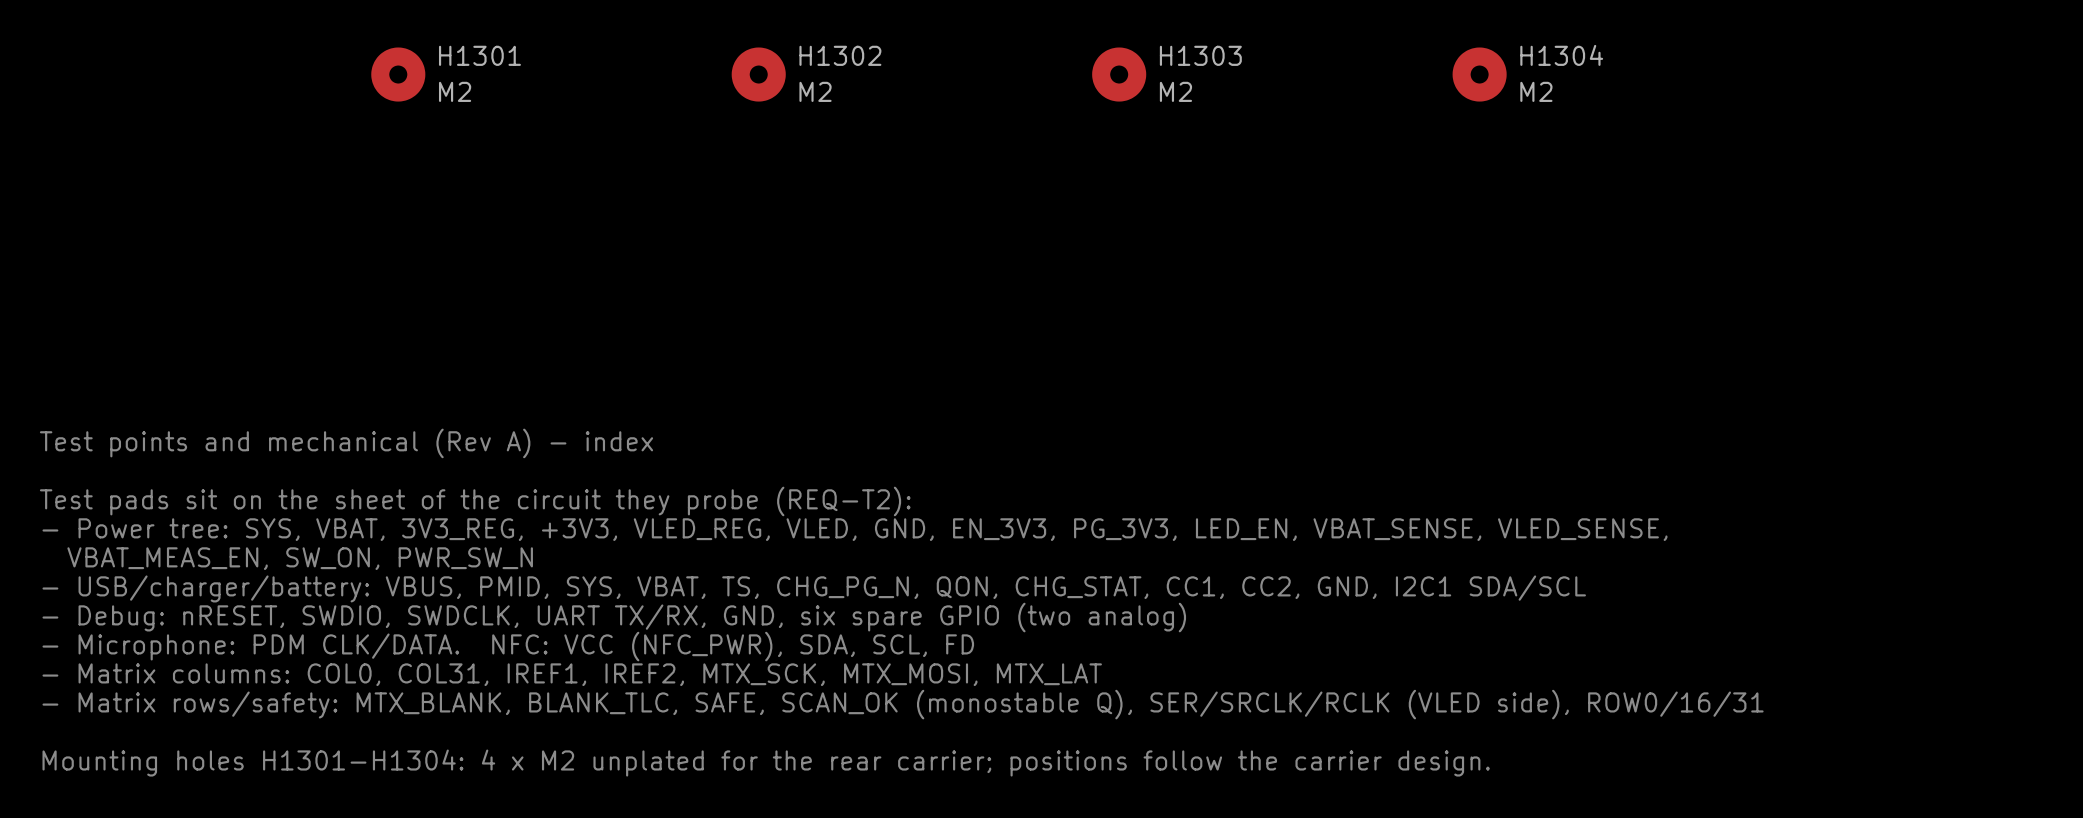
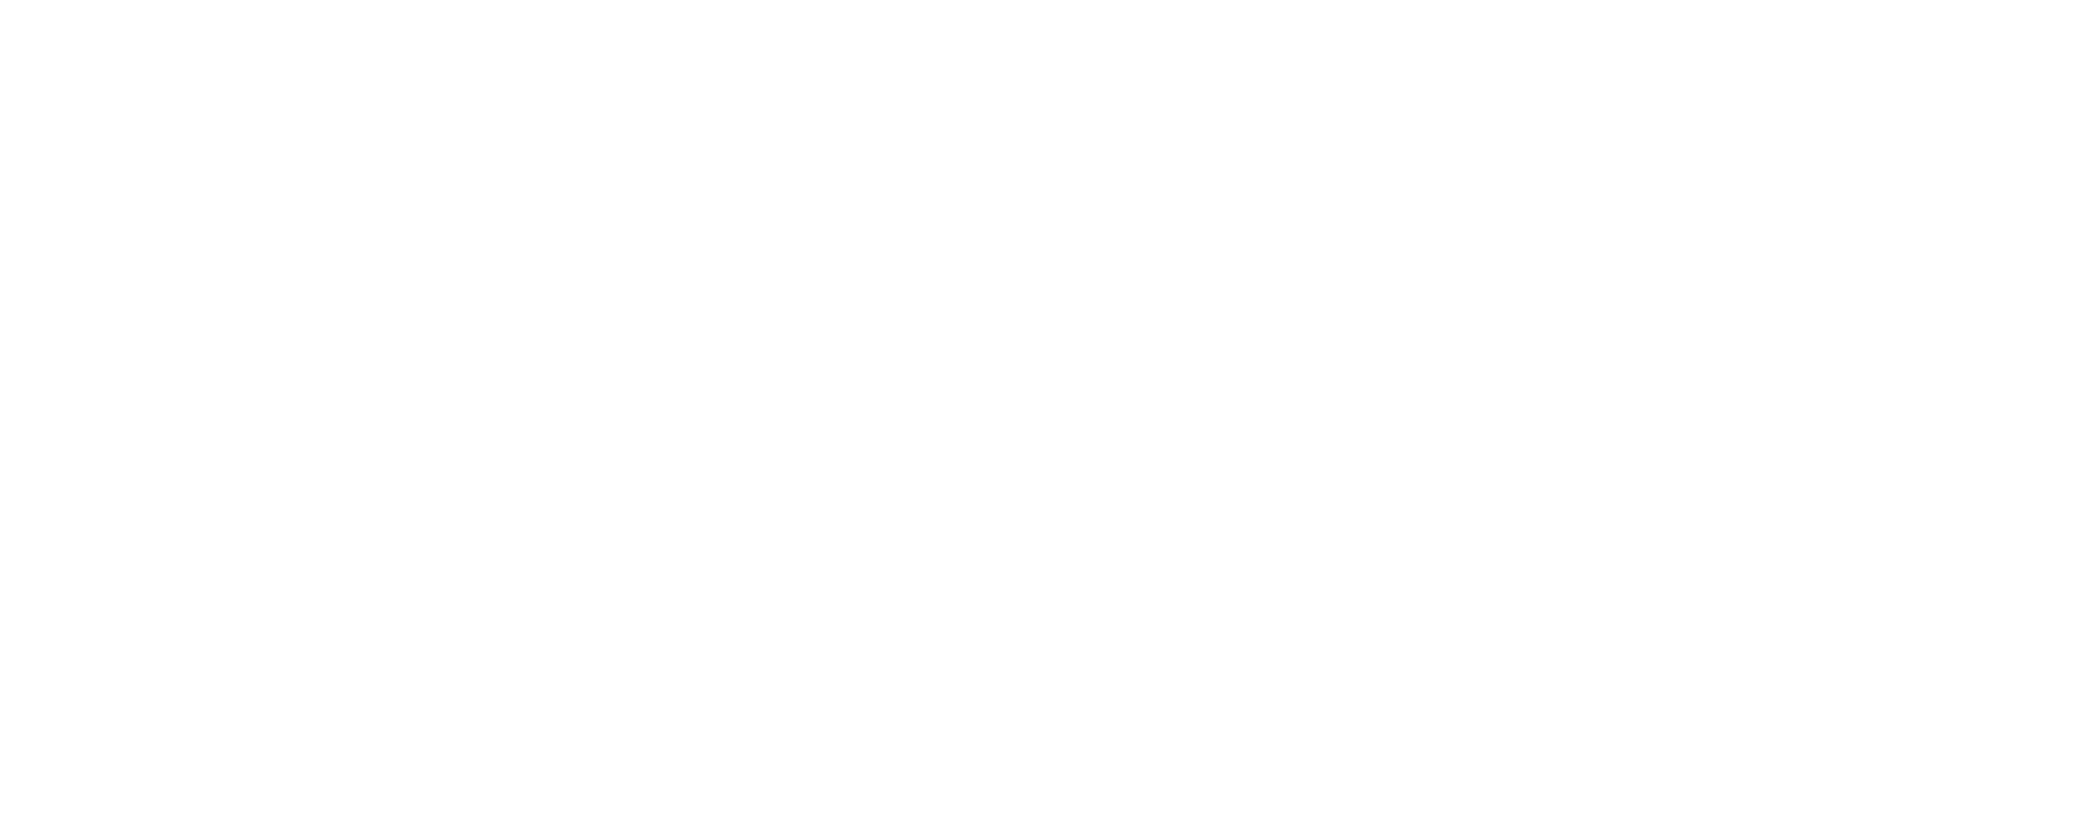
H1301: M2 (398, 74) -> none
H1302: M2 (758, 74) -> none
H1303: M2 (1119, 74) -> none
H1304: M2 (1479, 74) -> none
text: Test points and mechanical (Rev A) - index (346, 443) -> none
text: Test pads sit on the sheet of the circuit they probe (REQ-T2): (475, 501) -> none
text: - Power tree: SYS, VBAT, 3V3_REG, +3V3, VLED_REG, VLED, GND, EN_3V3, PG_3V3, LED_EN, VBAT_SENSE, VLED_SENSE, (854, 529) -> none
text: VBAT_MEAS_EN, SW_ON, PWR_SW_N (300, 558) -> none
text: - USB/charger/battery: VBUS, PMID, SYS, VBAT, TS, CHG_PG_N, QON, CHG_STAT, CC1, CC2, GND, I2C1 SDA/SCL (814, 588) -> none
text: - Debug: nRESET, SWDIO, SWDCLK, UART TX/RX, GND, six spare GPIO (two analog) (614, 617) -> none
text: - Microphone: PDM CLK/DATA. NFC: VCC (NFC_PWR), SDA, SCL, FD (508, 646) -> none
text: - Matrix columns: COL0, COL31, IREF1, IREF2, MTX_SCK, MTX_MOSI, MTX_LAT (572, 674) -> none
text: - Matrix rows/safety: MTX_BLANK, BLANK_TLC, SAFE, SCAN_OK (monostable Q), SER/SRCLK/RCLK (VLED side), ROW0/16/31 (903, 704) -> none
text: Mounting holes H1301-H1304: 4 x M2 unplated for the rear carrier; positions follow the carrier design. (766, 763) -> none

